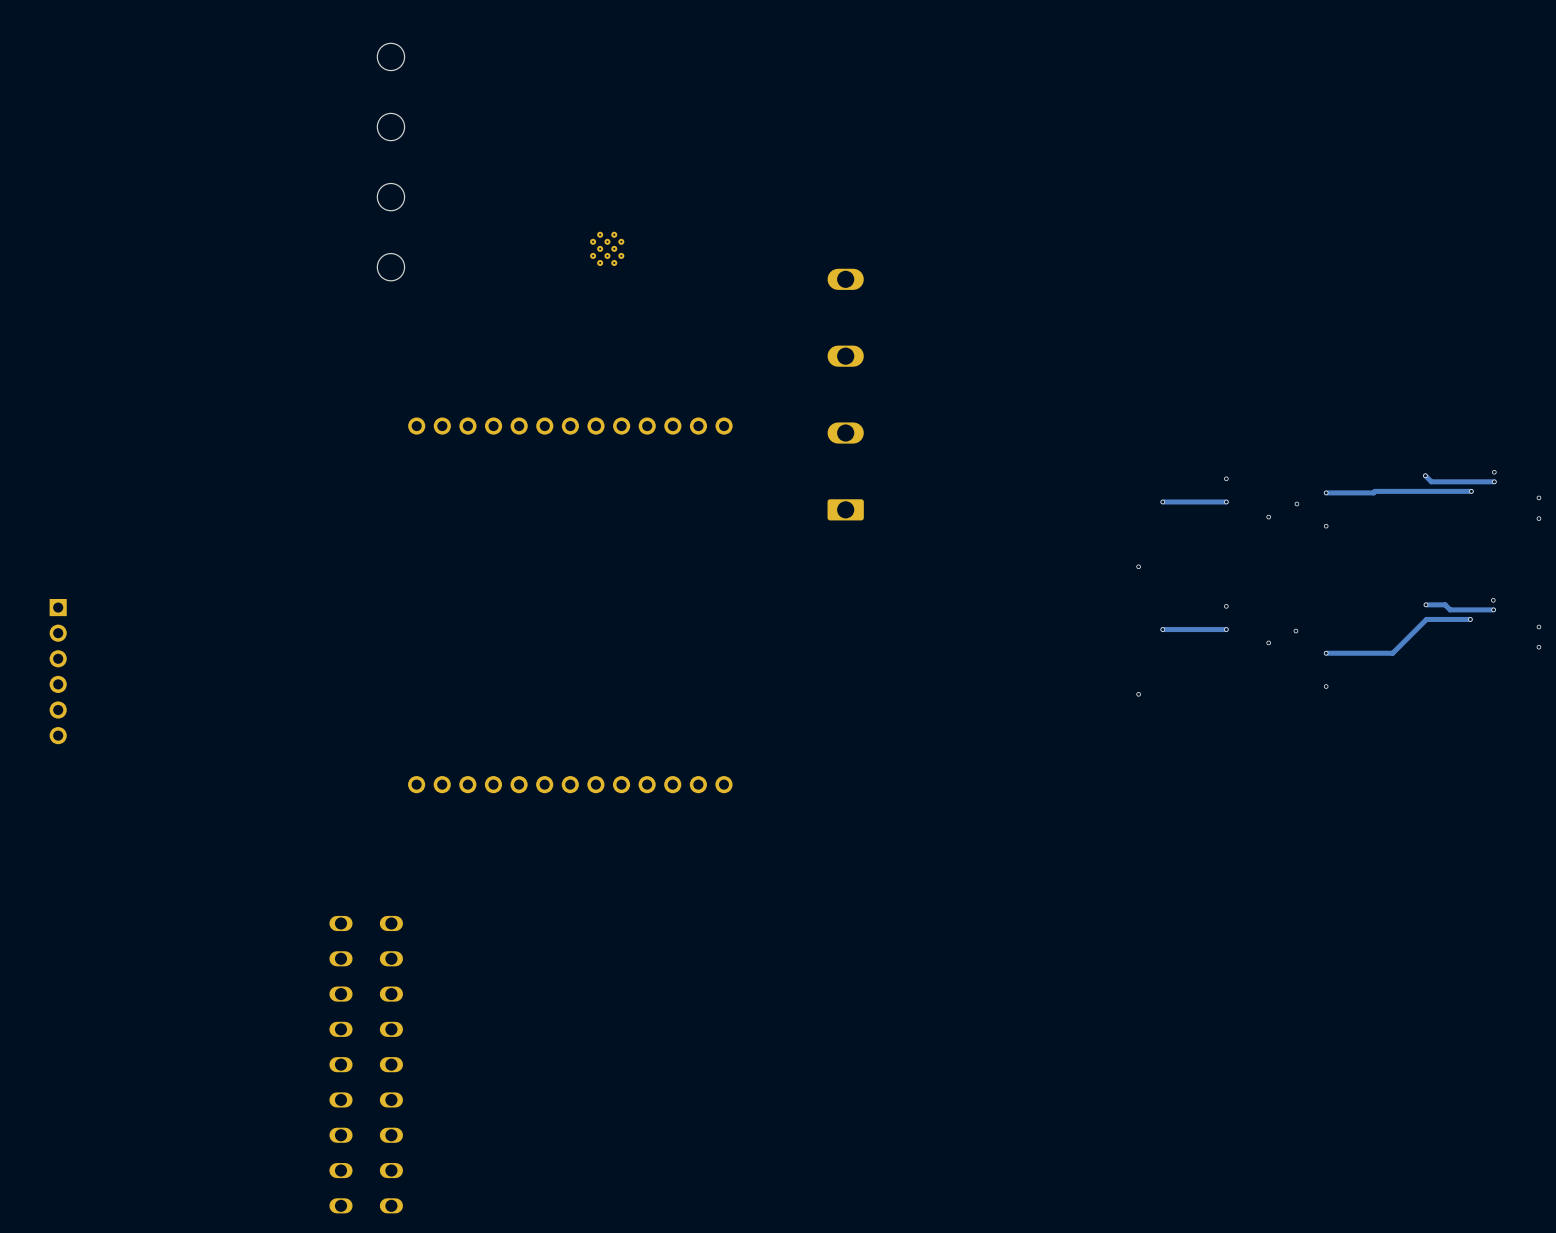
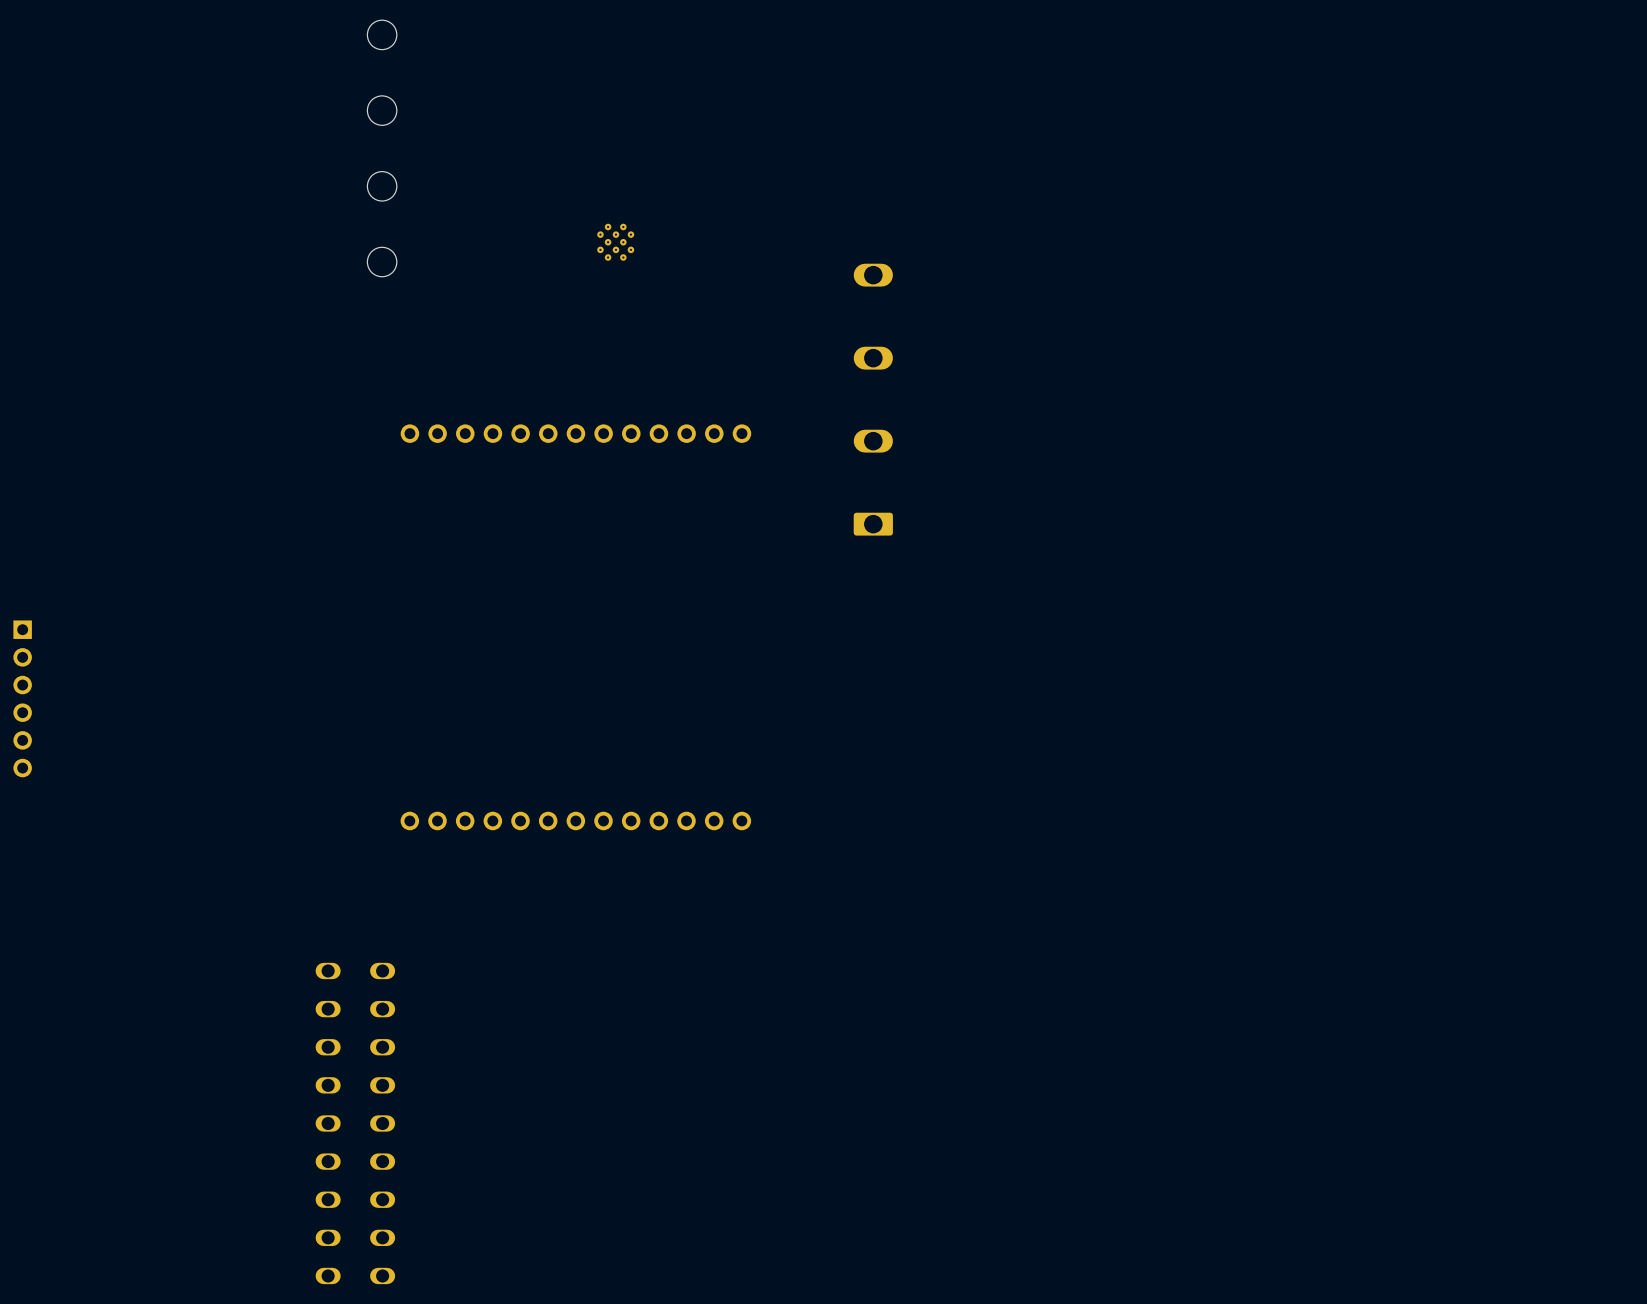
via: (1494, 472) -> none
track: (1425, 475) (1431, 481) (1494, 481) -> none
via: (1425, 475) -> none
via: (1226, 478) -> none
via: (1494, 481) -> none
track: (1471, 491) (1326, 492) -> none
via: (1471, 491) -> none
via: (1326, 492) -> none
via: (1538, 497) -> none
via: (1162, 501) -> none
track: (1226, 501) (1162, 501) -> none
via: (1226, 501) -> none
via: (1296, 504) -> none
via: (1268, 517) -> none
via: (1538, 518) -> none
via: (1326, 526) -> none
via: (1138, 566) -> none
via: (1493, 600) -> none
track: (1426, 604) (1445, 604) (1450, 609) (1493, 609) -> none
via: (1426, 604) -> none
via: (1226, 606) -> none
via: (1493, 609) -> none
track: (1470, 619) (1426, 619) (1392, 653) (1326, 653) -> none
via: (1470, 619) -> none
via: (1538, 627) -> none
via: (1162, 629) -> none
track: (1226, 629) (1162, 629) -> none
via: (1226, 629) -> none
via: (1295, 631) -> none
via: (1268, 642) -> none
via: (1538, 647) -> none
via: (1326, 653) -> none
via: (1326, 686) -> none
via: (1138, 694) -> none

